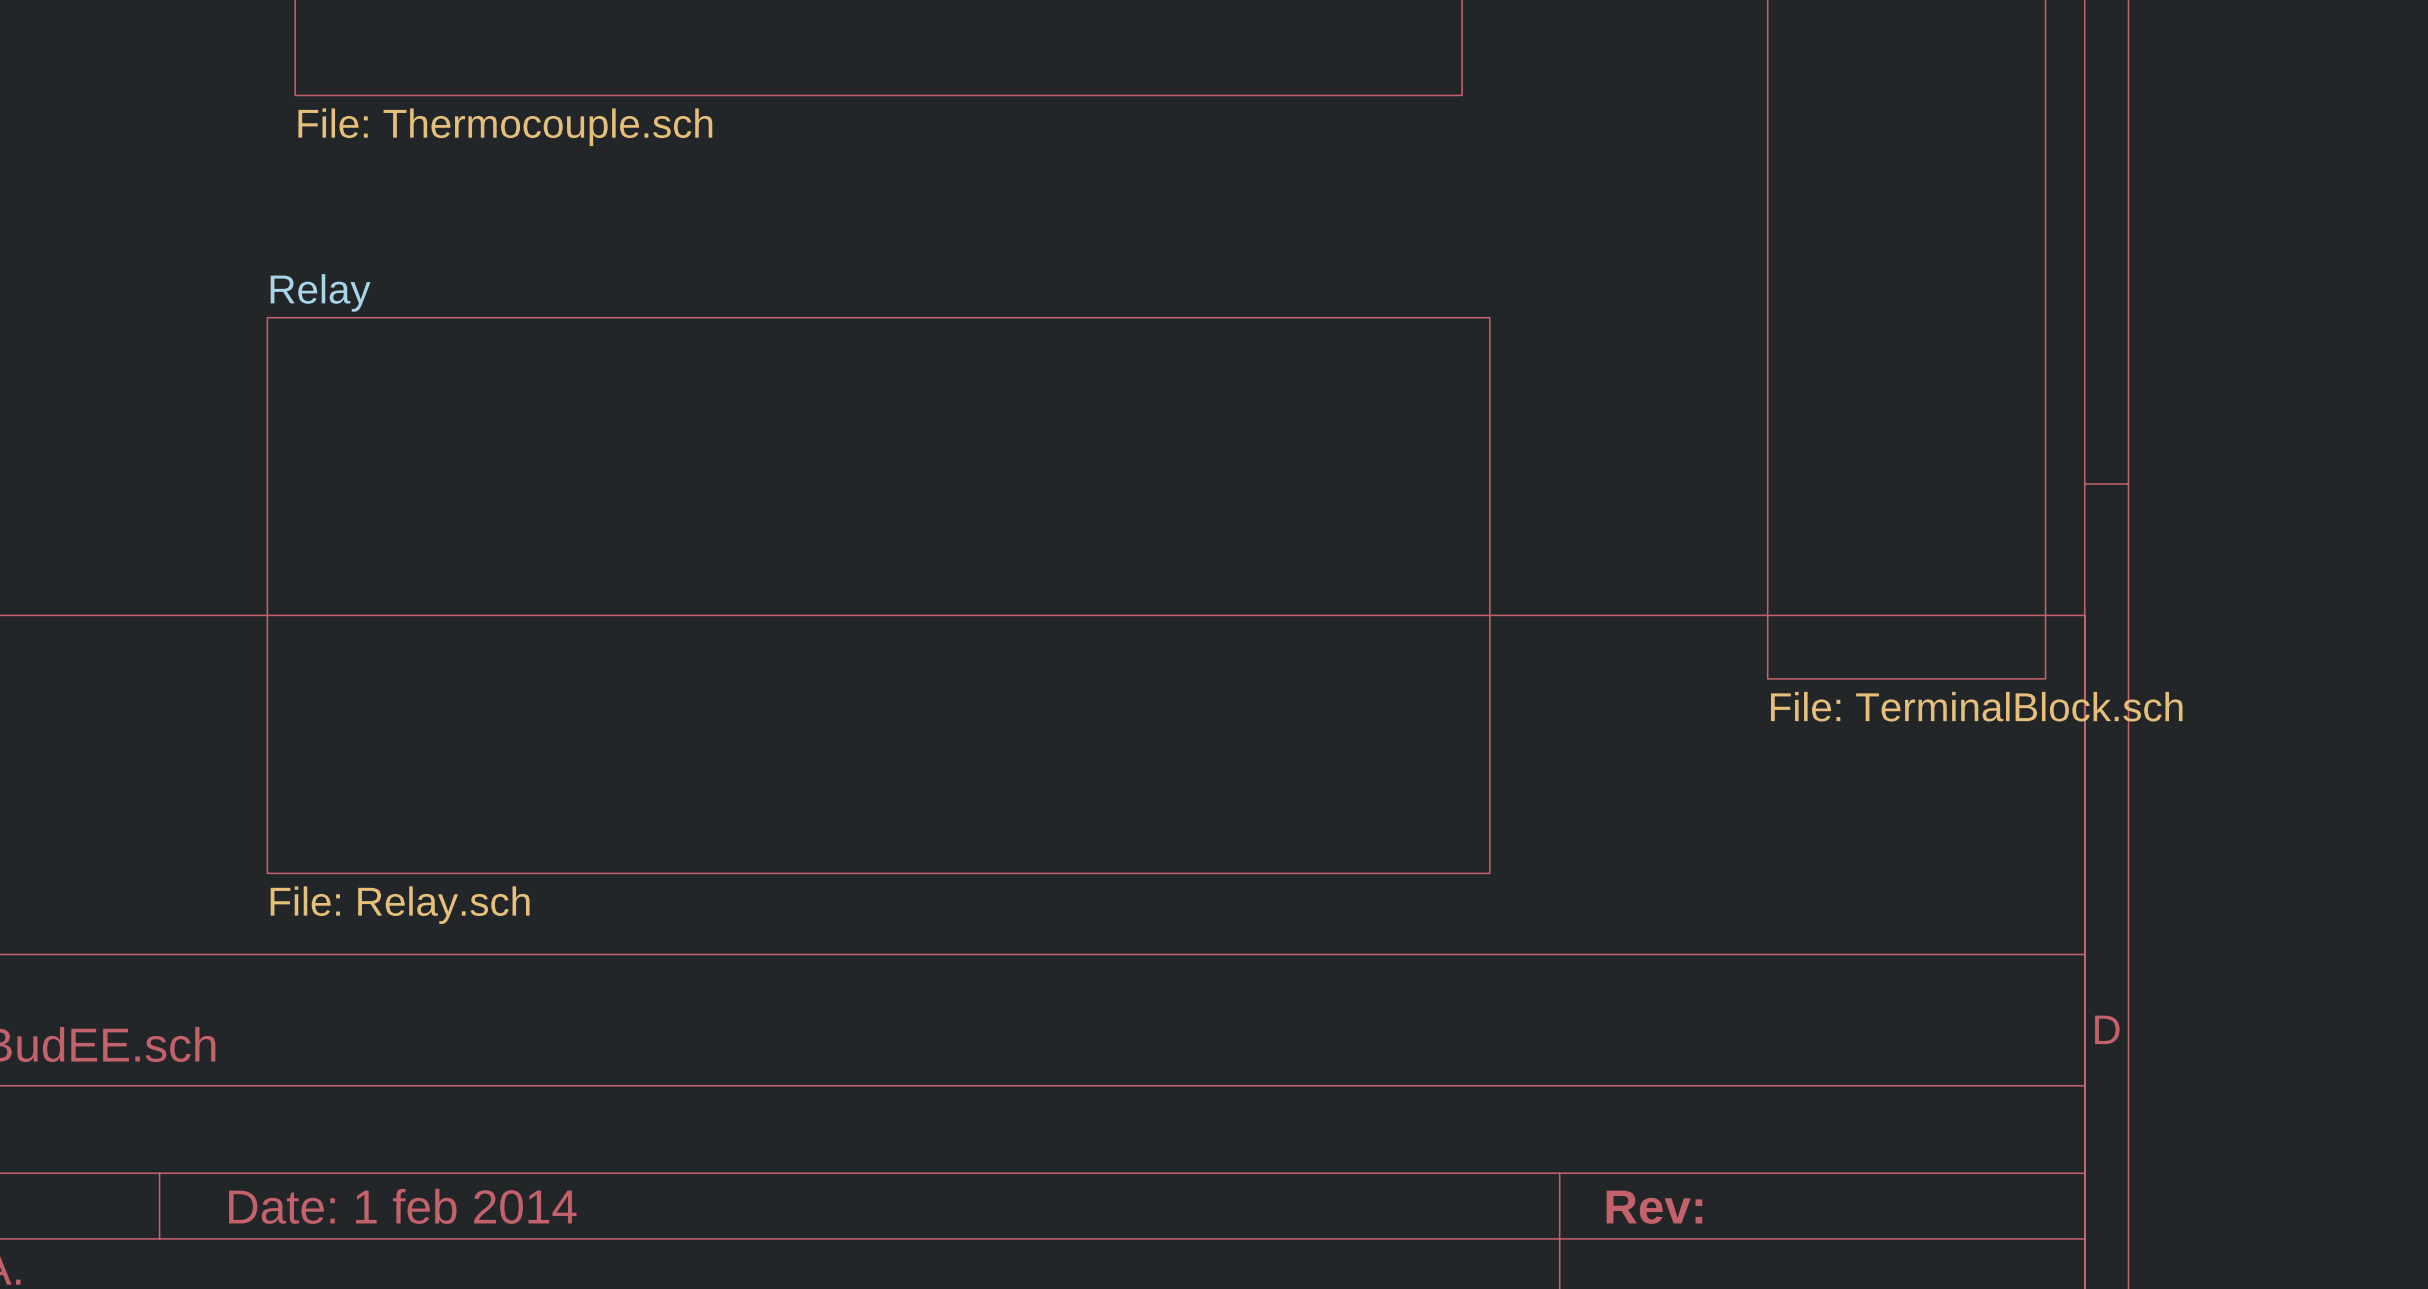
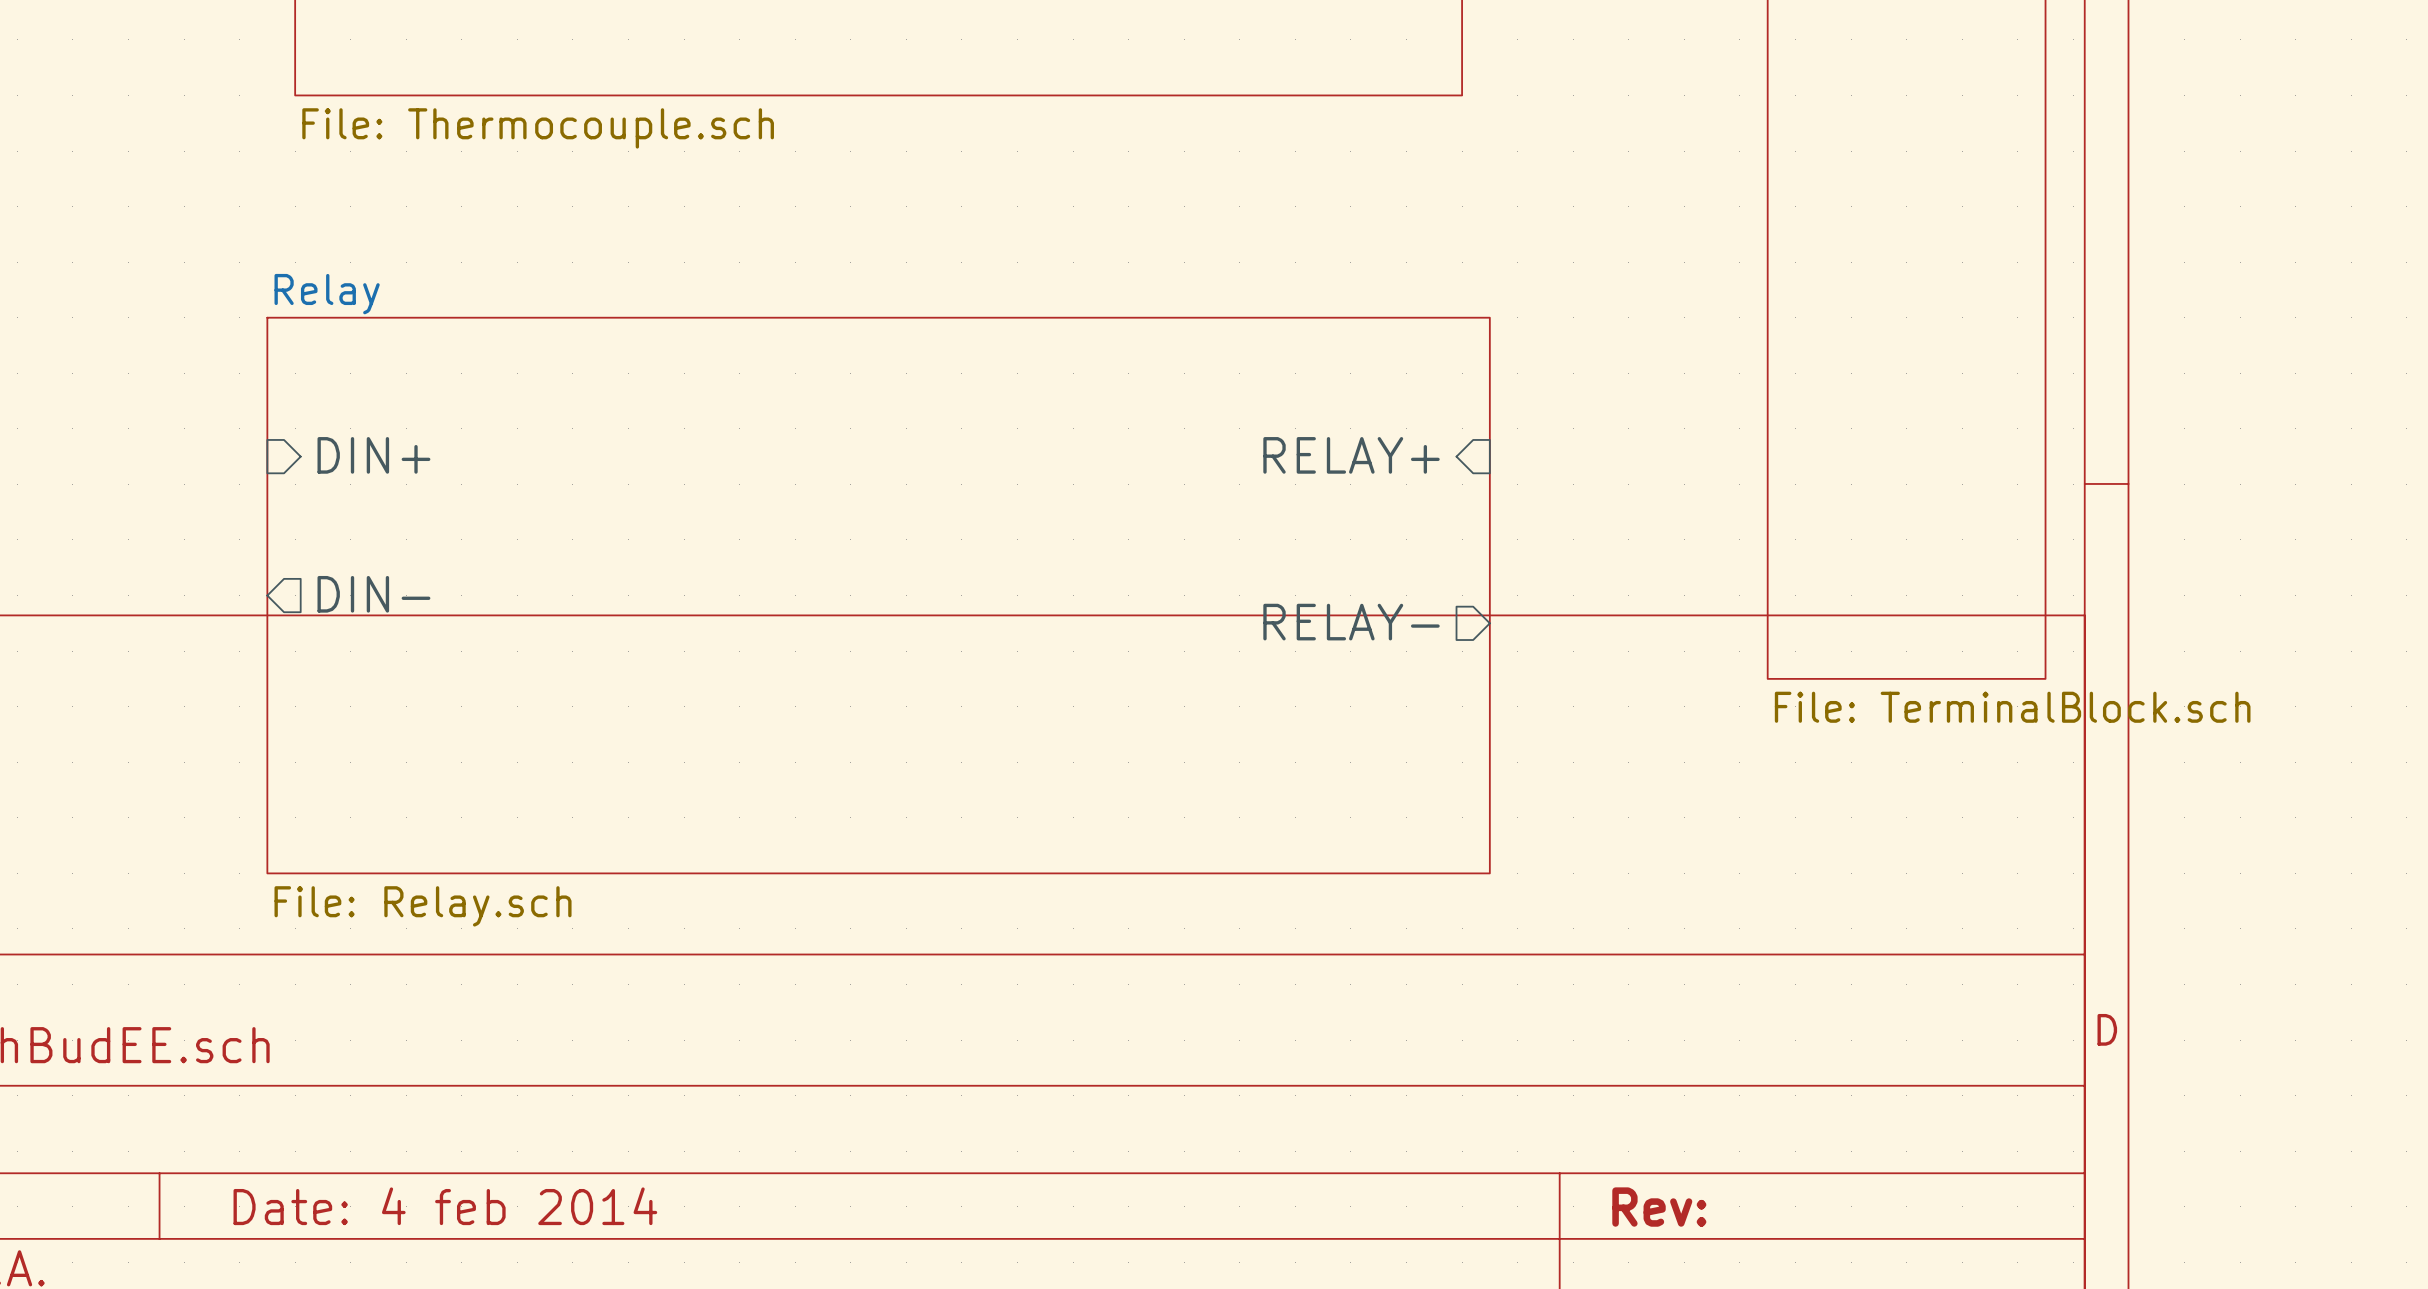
sheet pin: none -> DIN+ (373, 455)
sheet pin: none -> RELAY+ (1351, 455)
sheet pin: none -> DIN- (373, 594)
sheet pin: none -> RELAY- (1351, 622)
title block: Date: 1 feb 2014 (402, 1206) -> Date: 4 feb 2014 (445, 1206)

